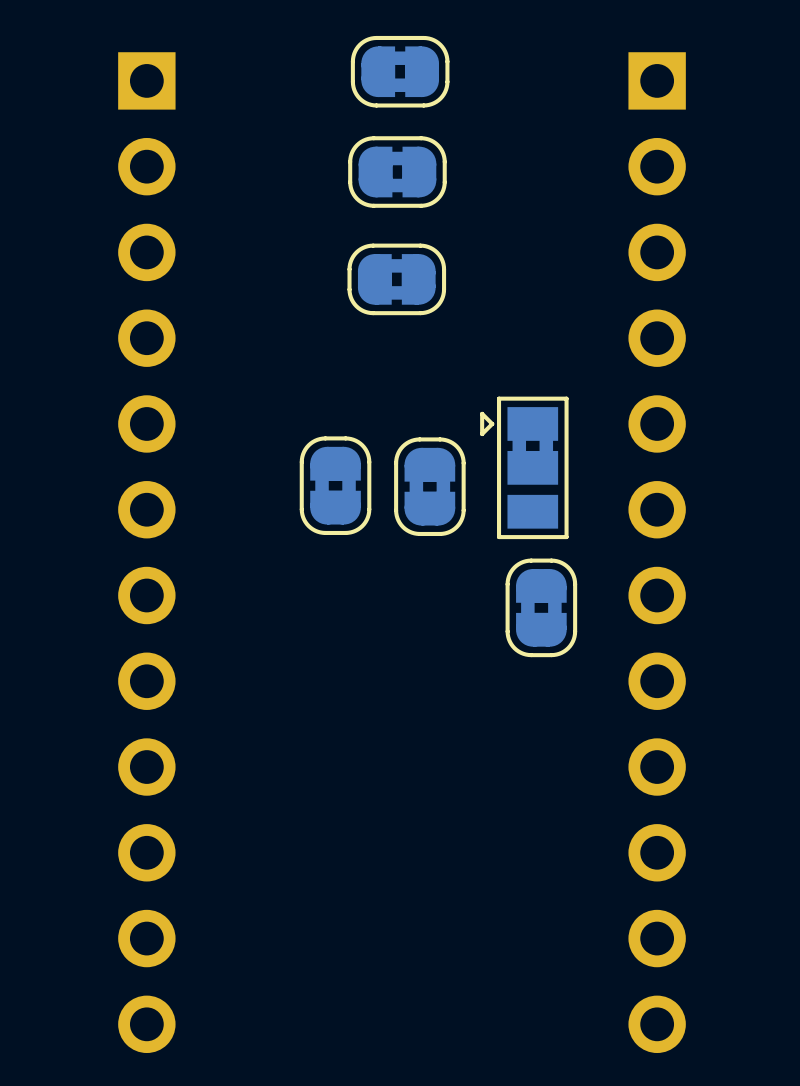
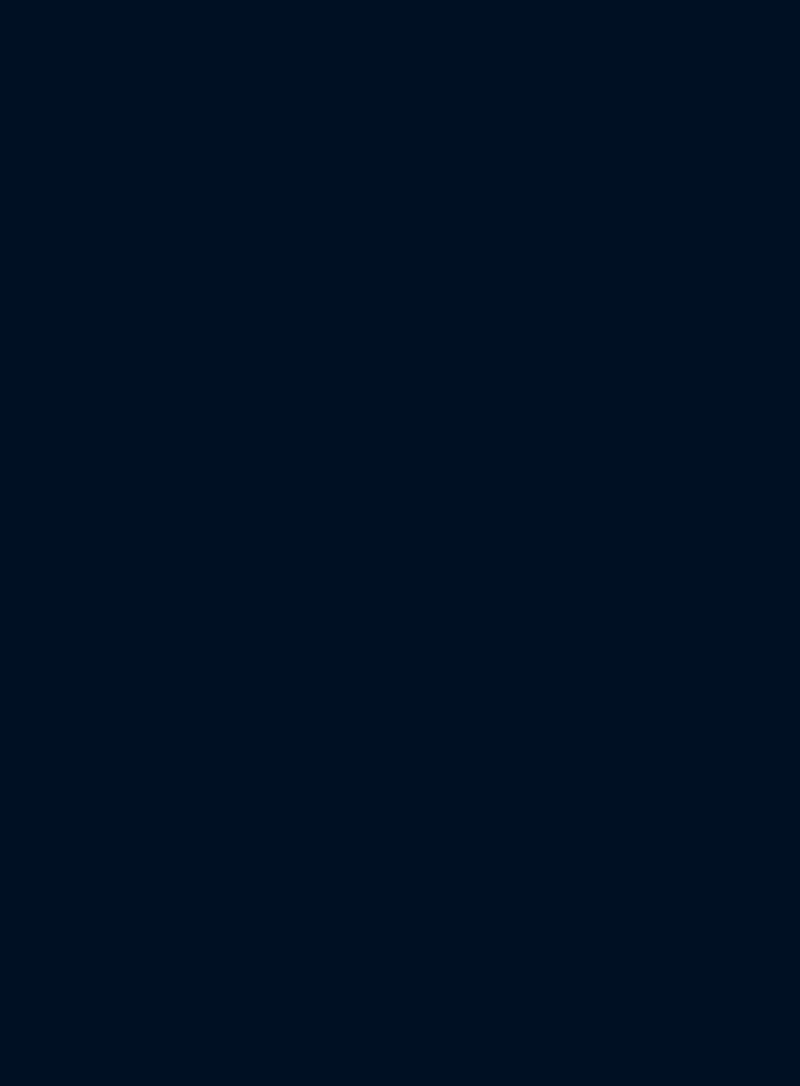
part: (400, 71) -> none
part: (397, 172) -> none
part: (396, 279) -> none
part: (524, 467) -> none
part: (335, 485) -> none
part: (429, 486) -> none
part: (146, 552) -> none
part: (657, 552) -> none
part: (541, 607) -> none

